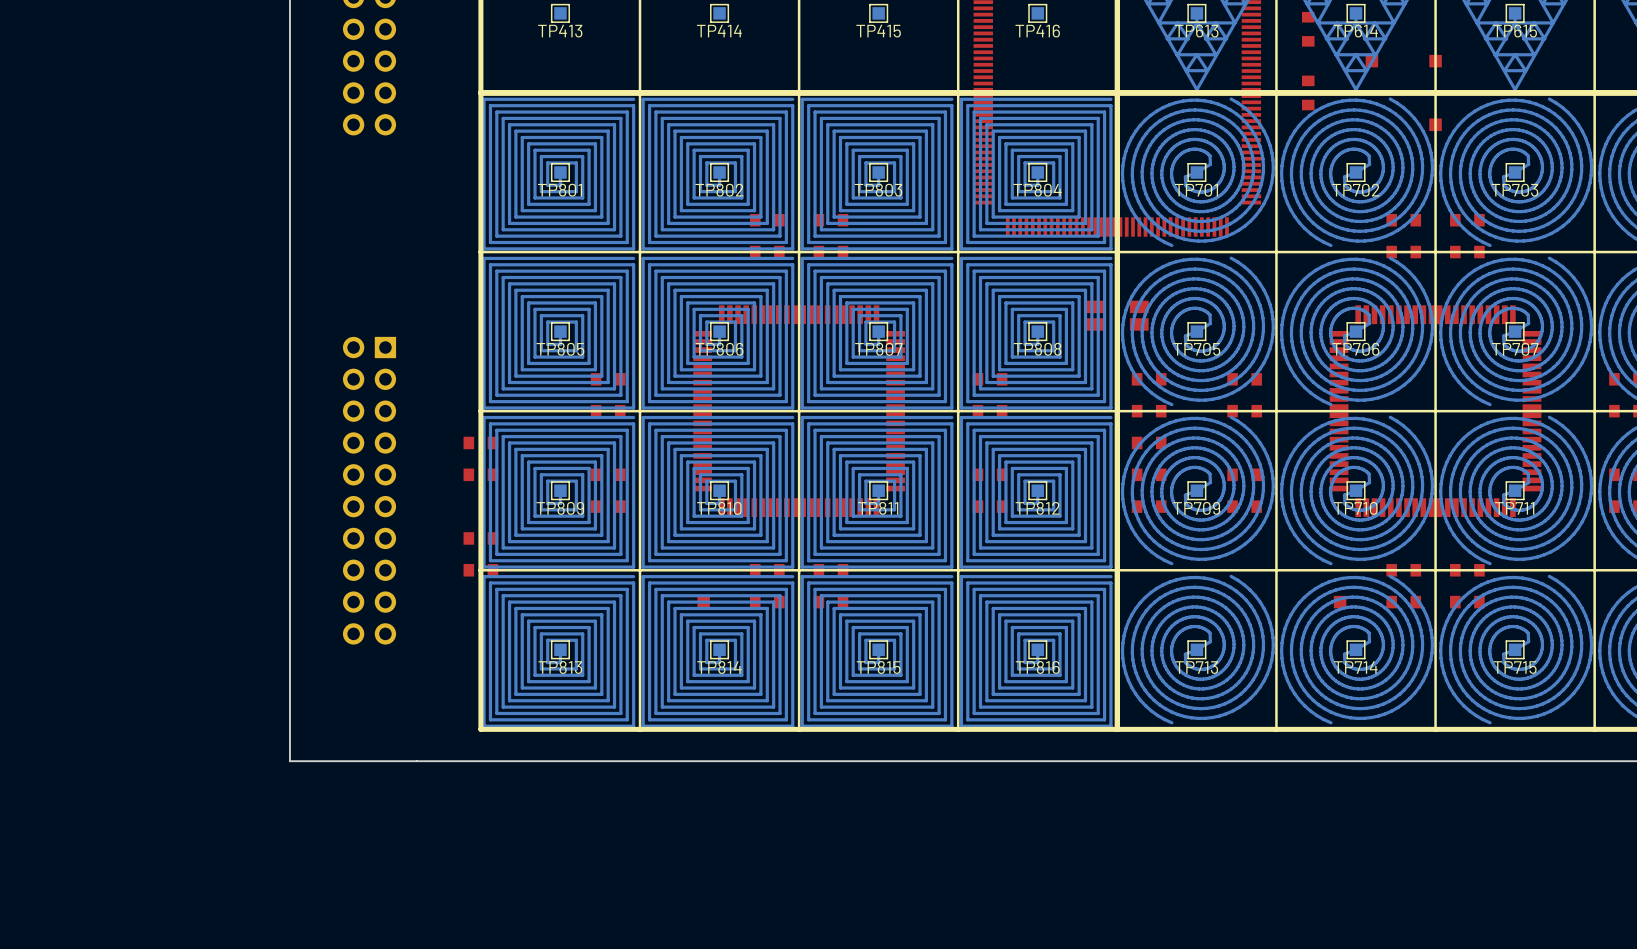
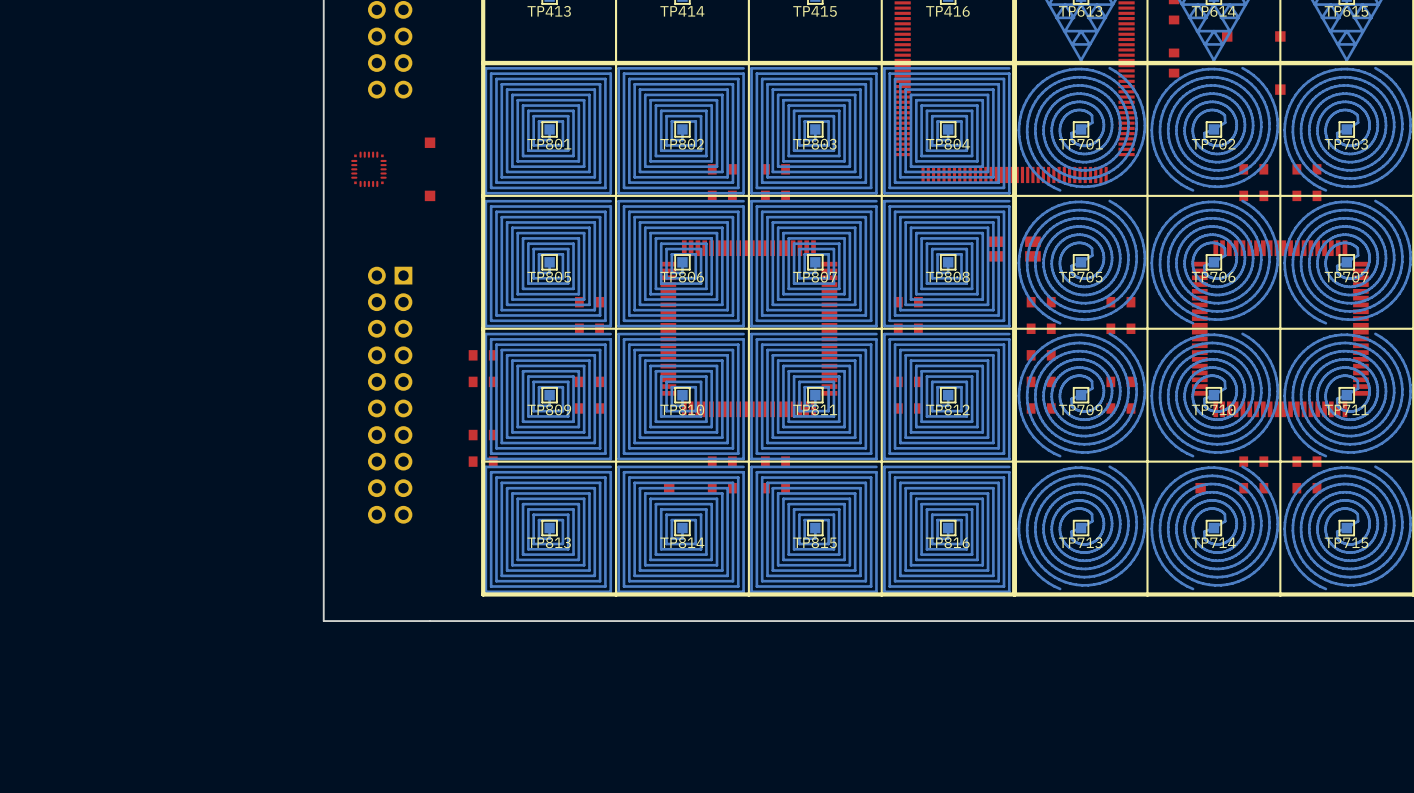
part: none -> (430, 142)
part: none -> (368, 169)
part: none -> (430, 195)

